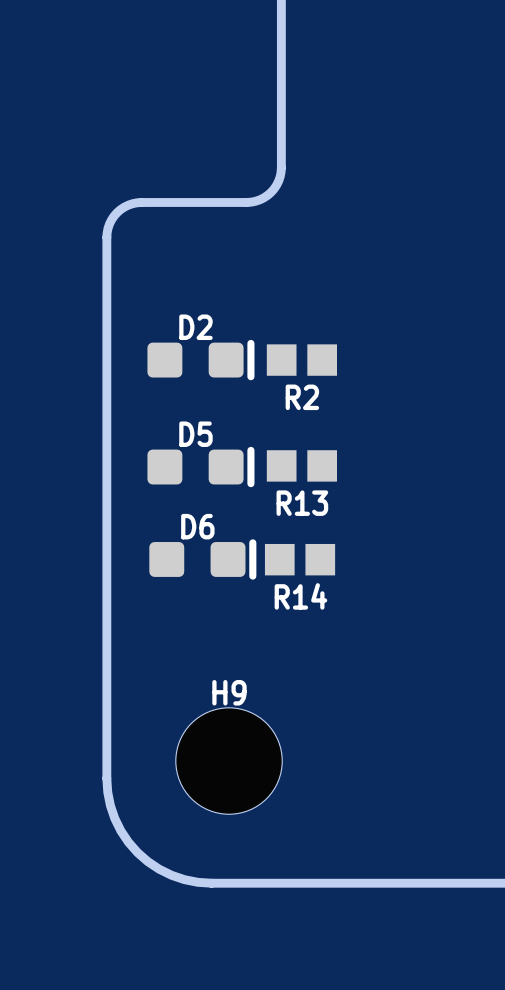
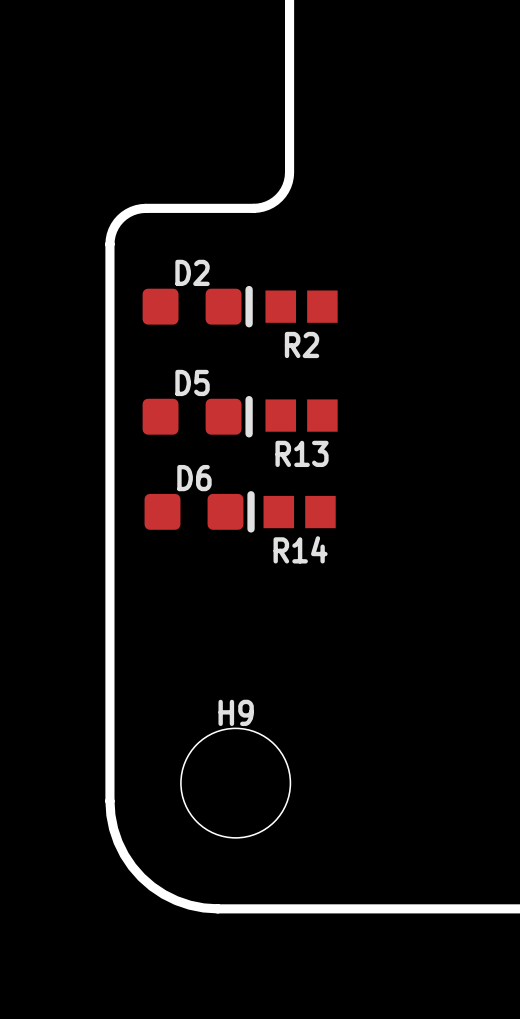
D2 position: (200, 360) -> (197, 306)
R2 position: (301, 360) -> (301, 306)
R13 position: (301, 465) -> (301, 415)
D5 position: (200, 467) -> (197, 416)
D6 position: (202, 559) -> (199, 511)
R14 position: (300, 559) -> (299, 512)

